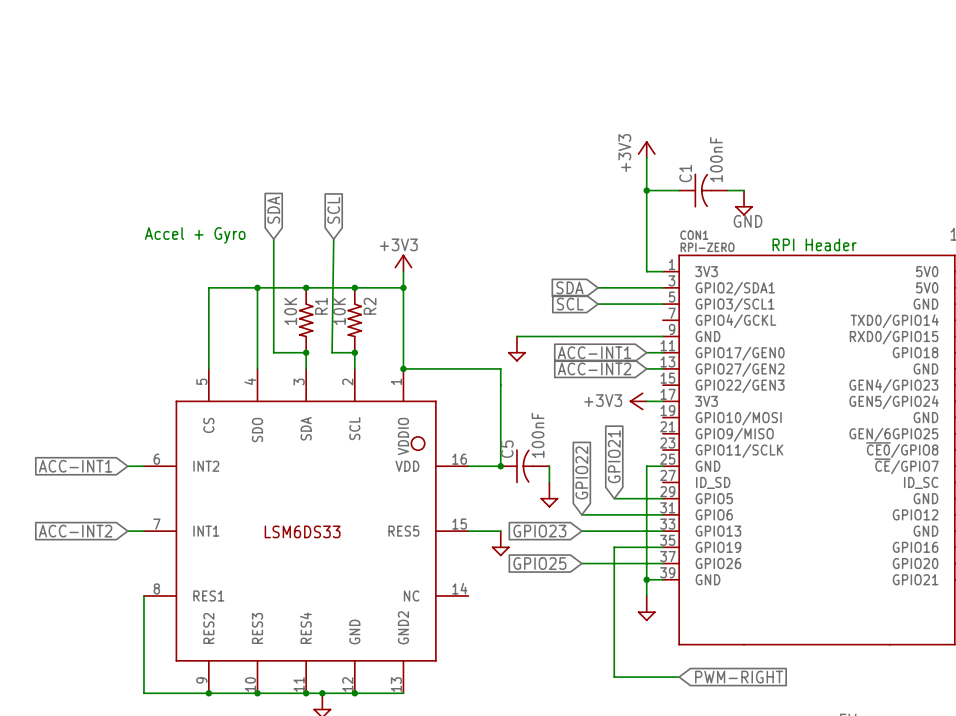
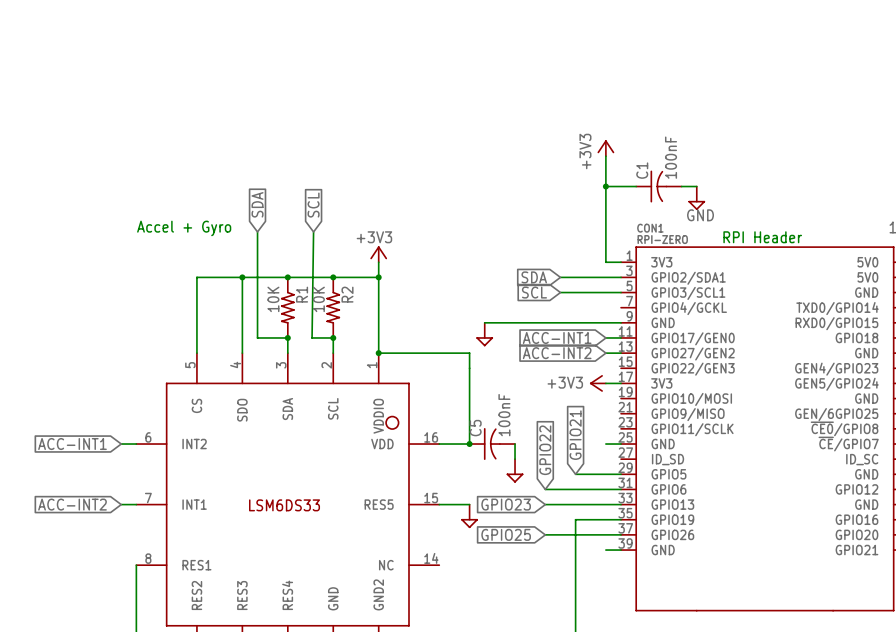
wire: (646, 466) (646, 595) -> none
junction: (646, 579) -> none
power symbol: (646, 608) -> none

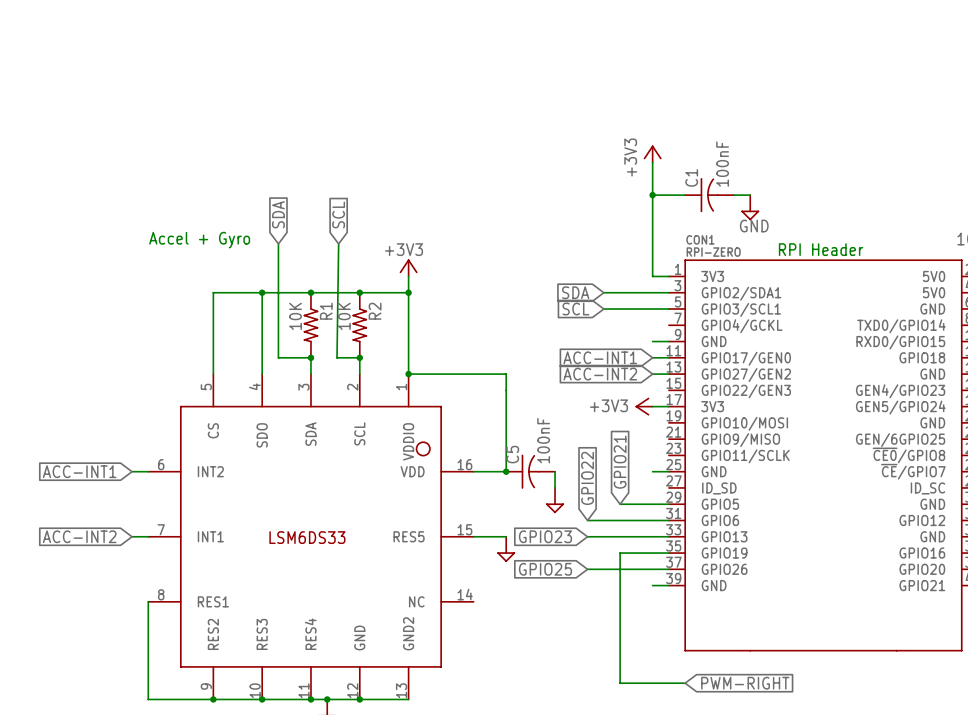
wire: (484, 322) (605, 322) -> none
power symbol: (484, 334) -> none

